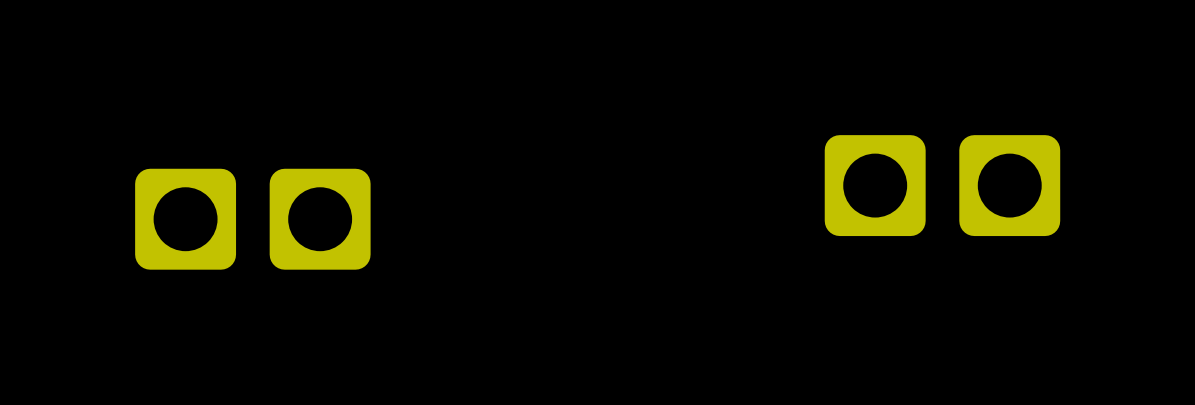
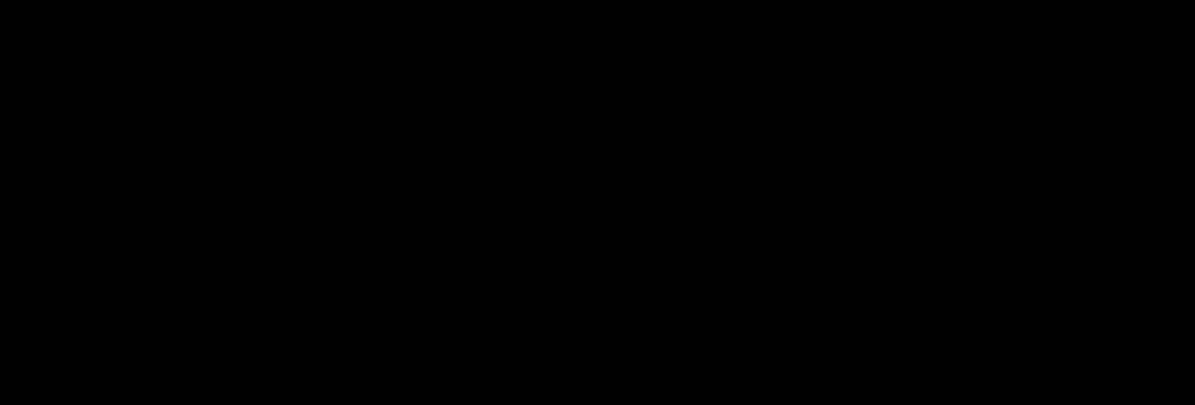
part: (942, 185) -> none
part: (252, 219) -> none

